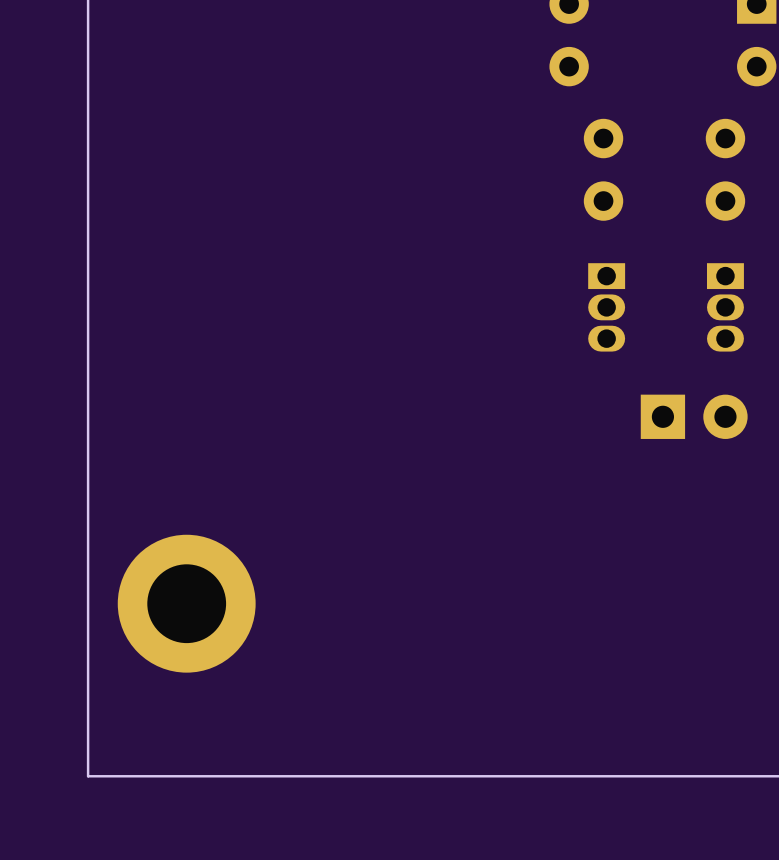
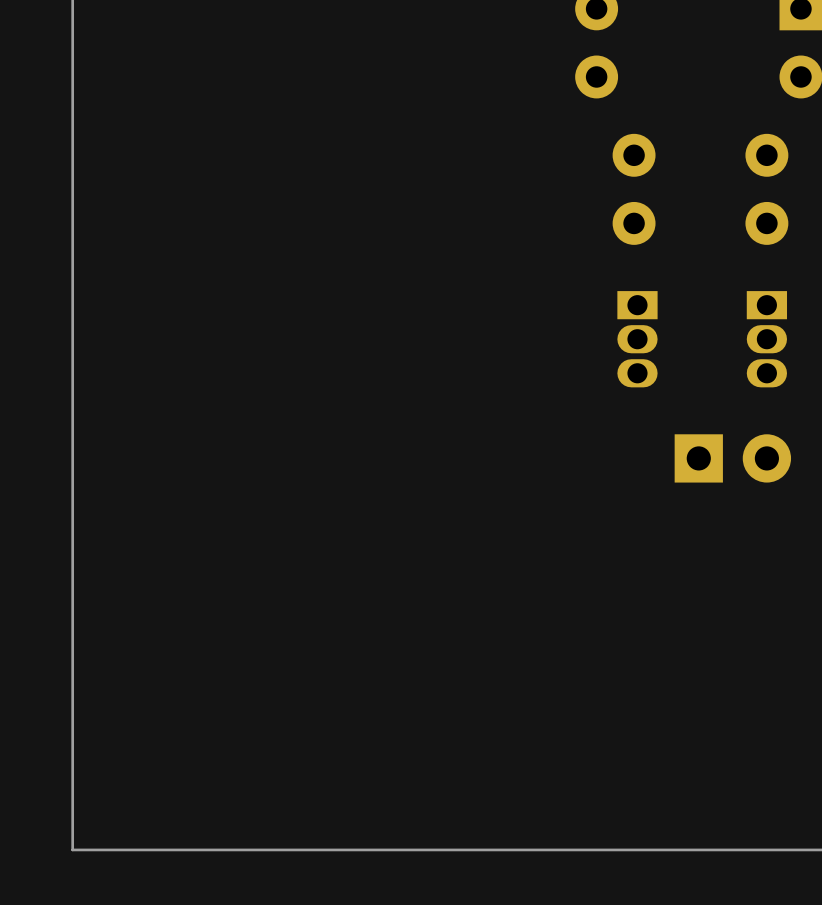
part: (186, 603) -> none

